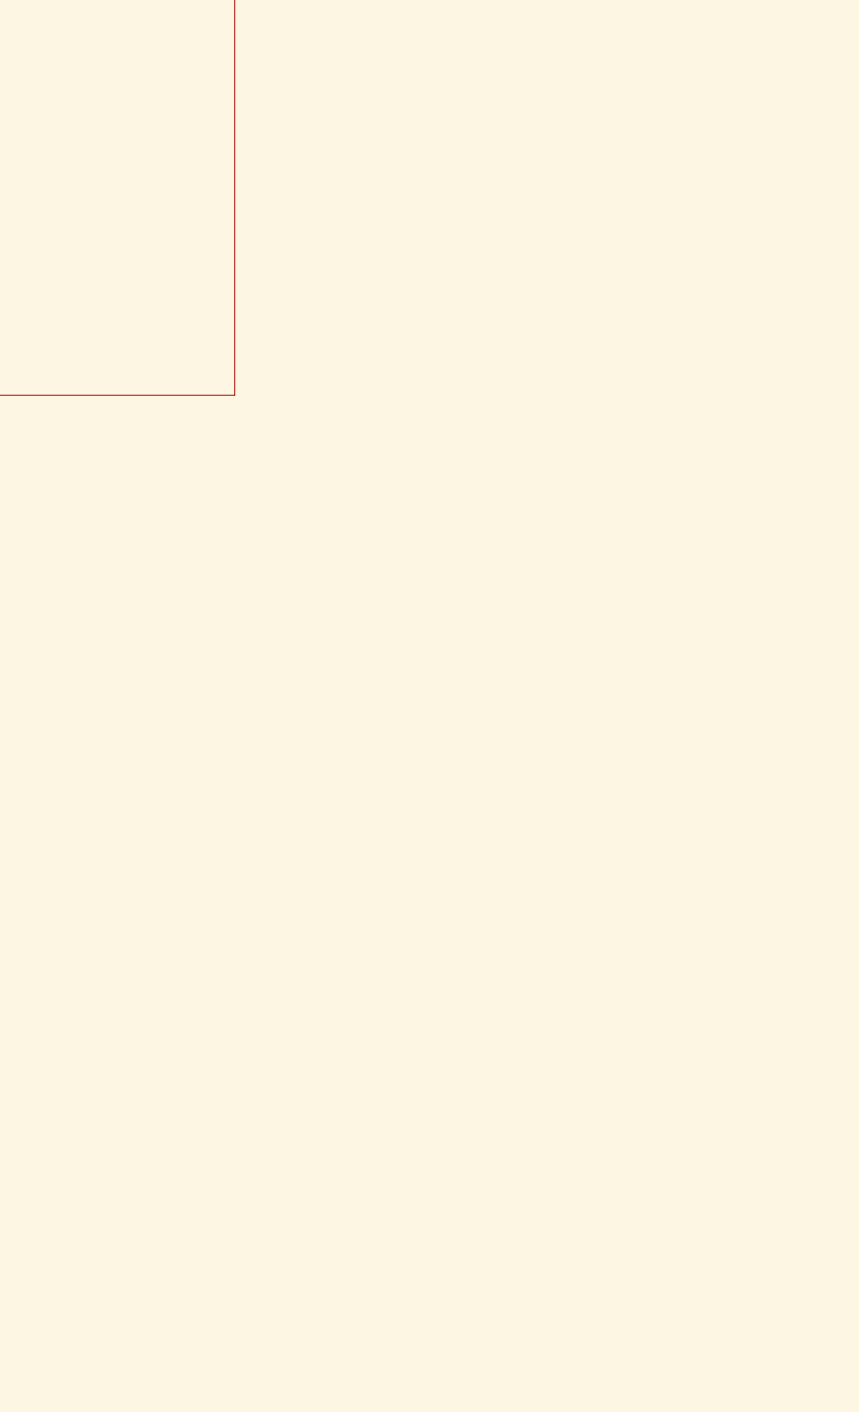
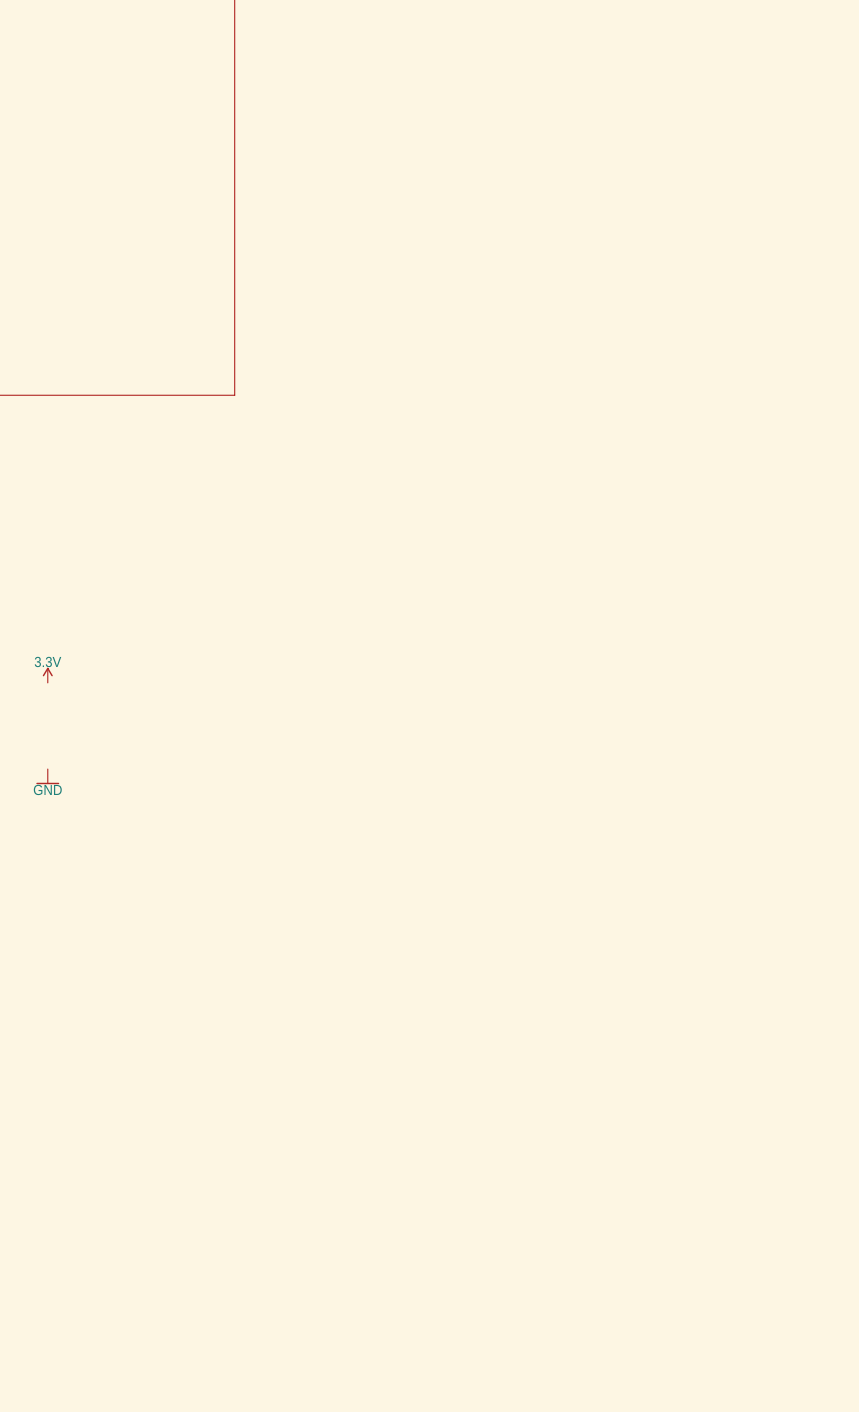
power symbol: none -> 3.3V (47, 675)
power symbol: none -> GND (47, 776)

